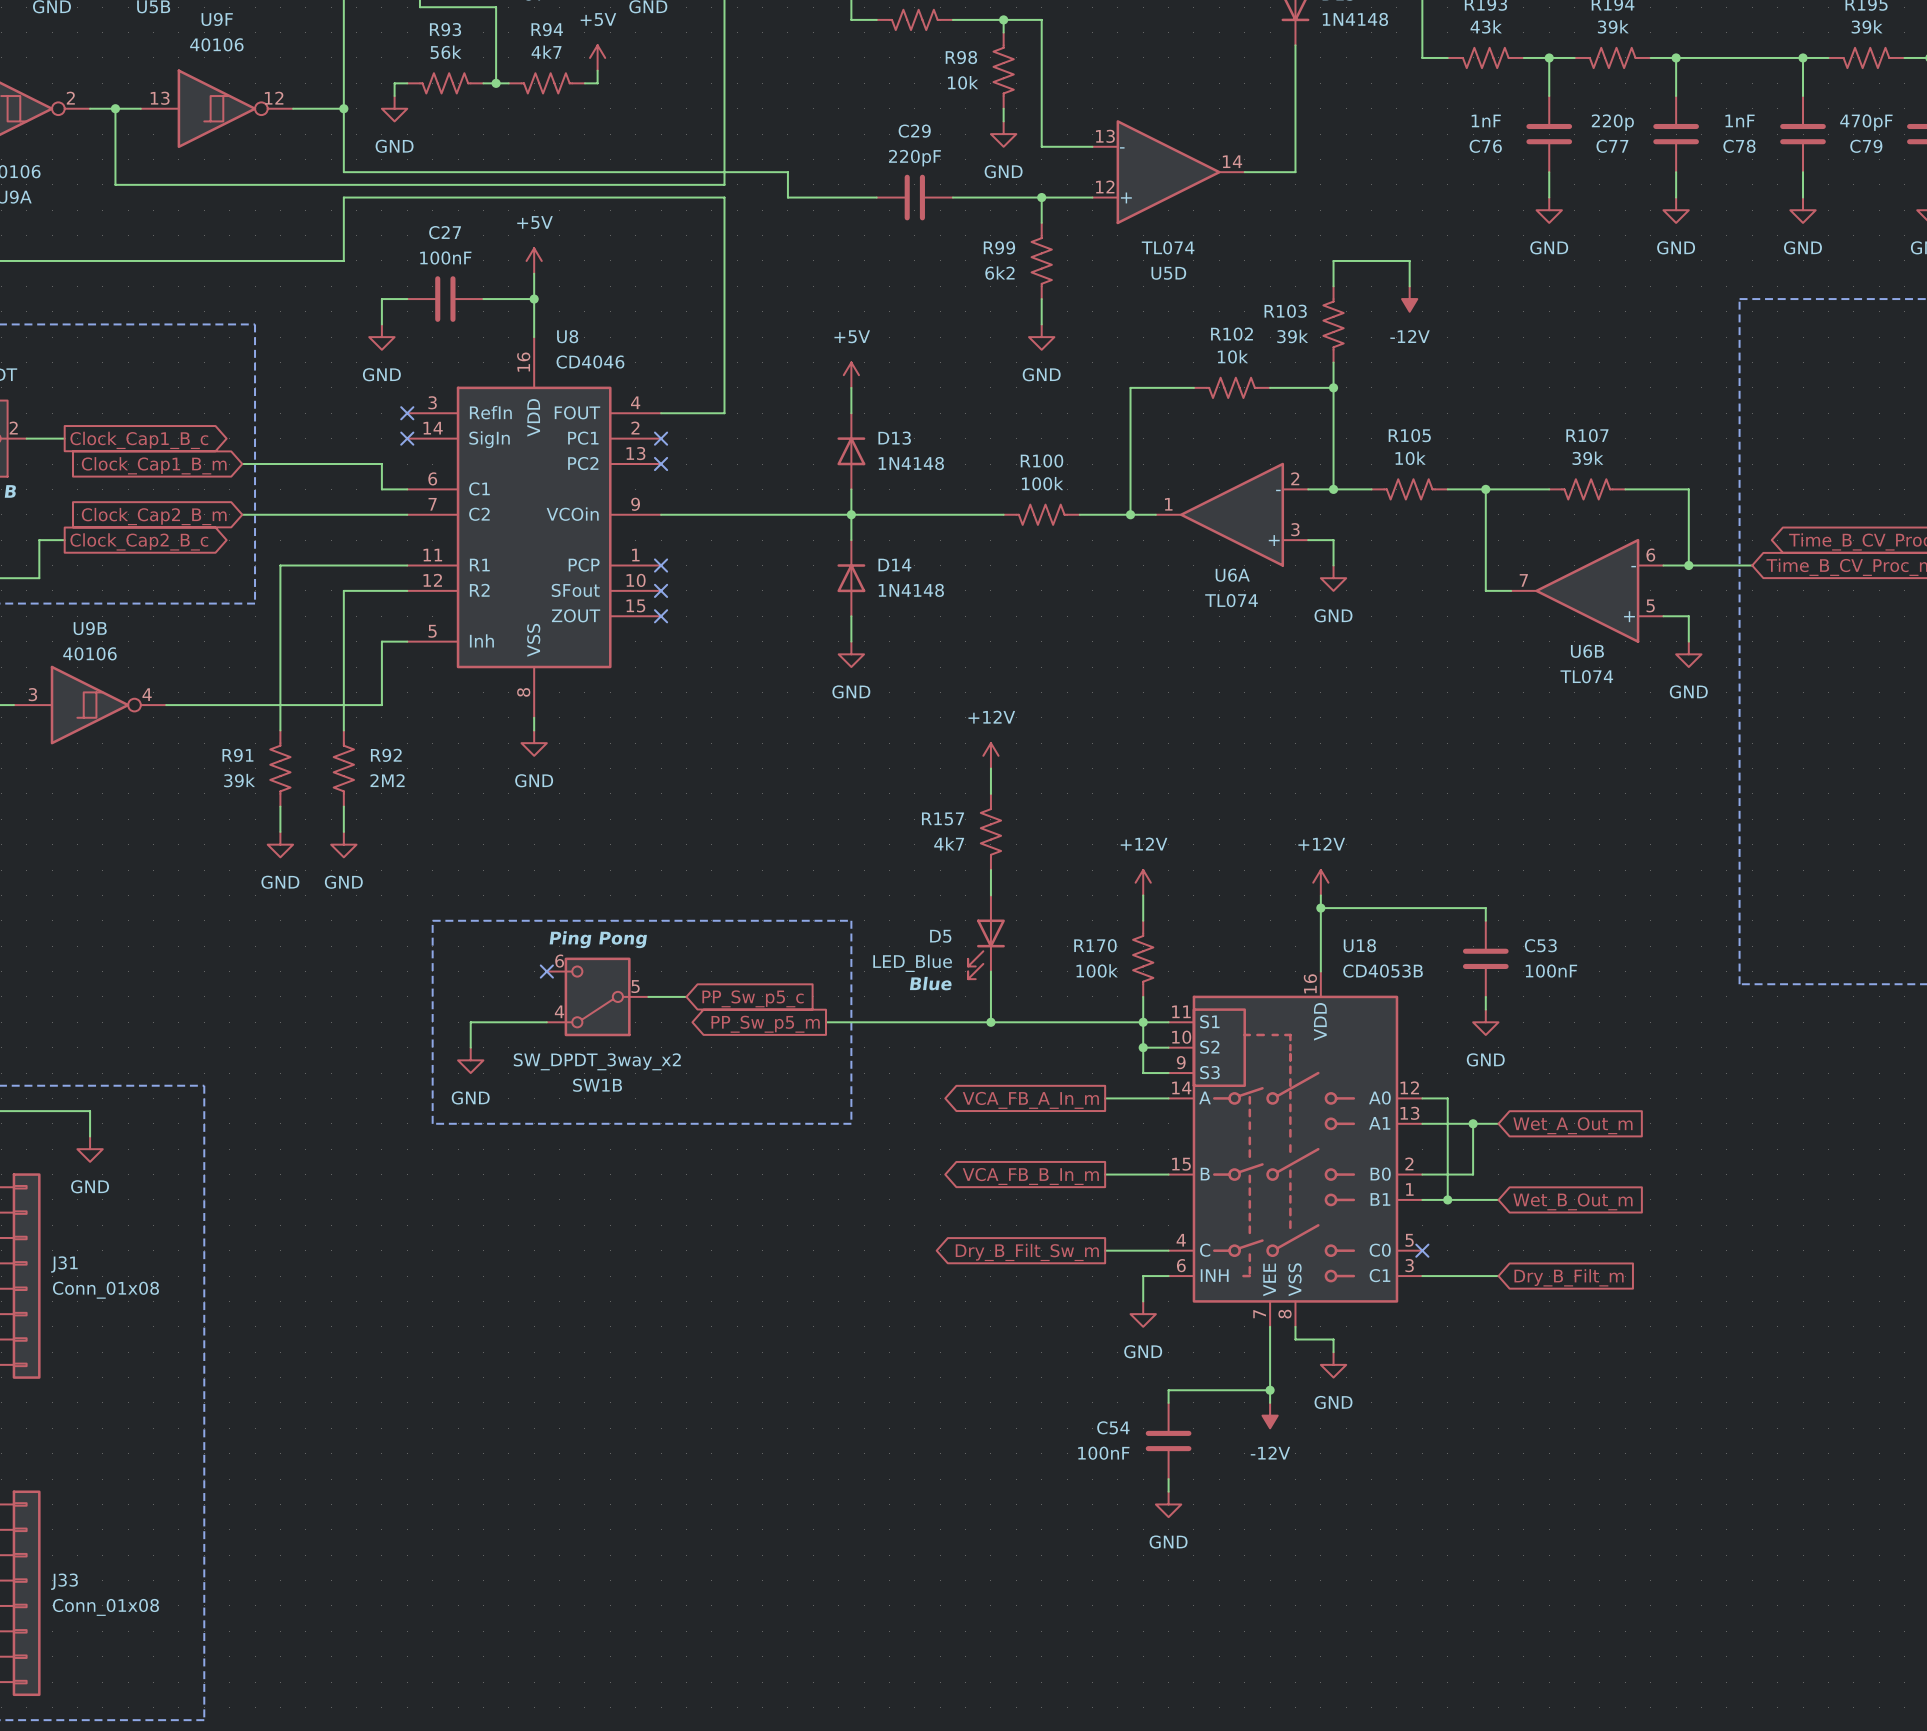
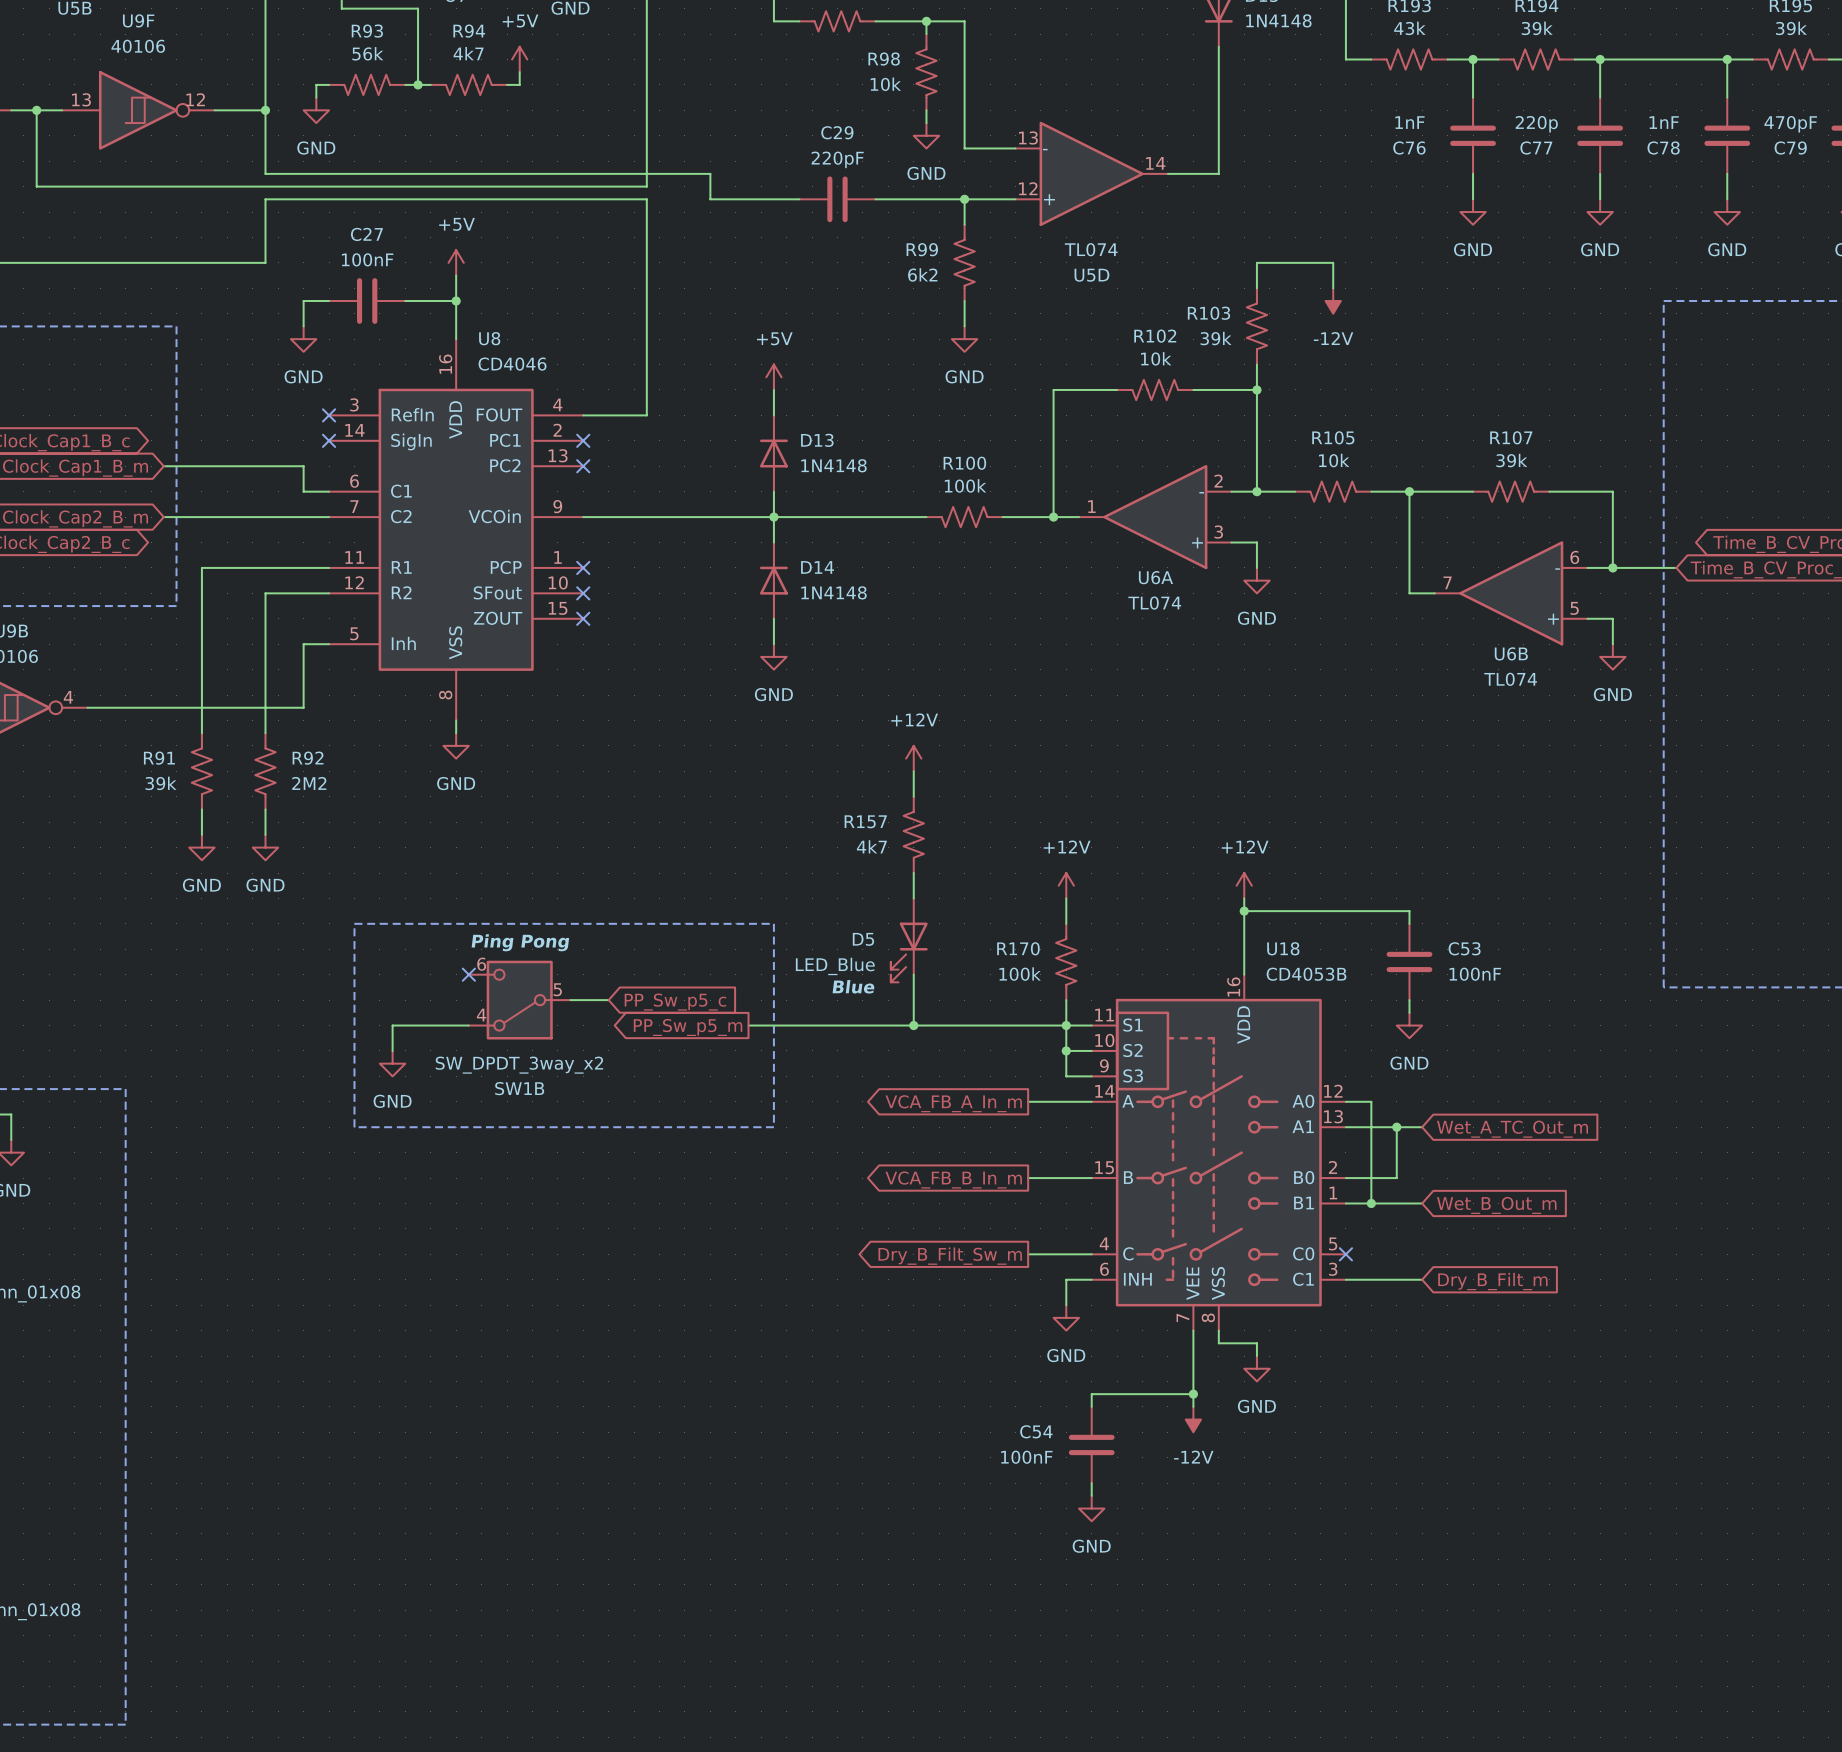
global label: Wet_A_Out_m (1572, 1125) -> Wet_A_TC_Out_m (1512, 1129)

